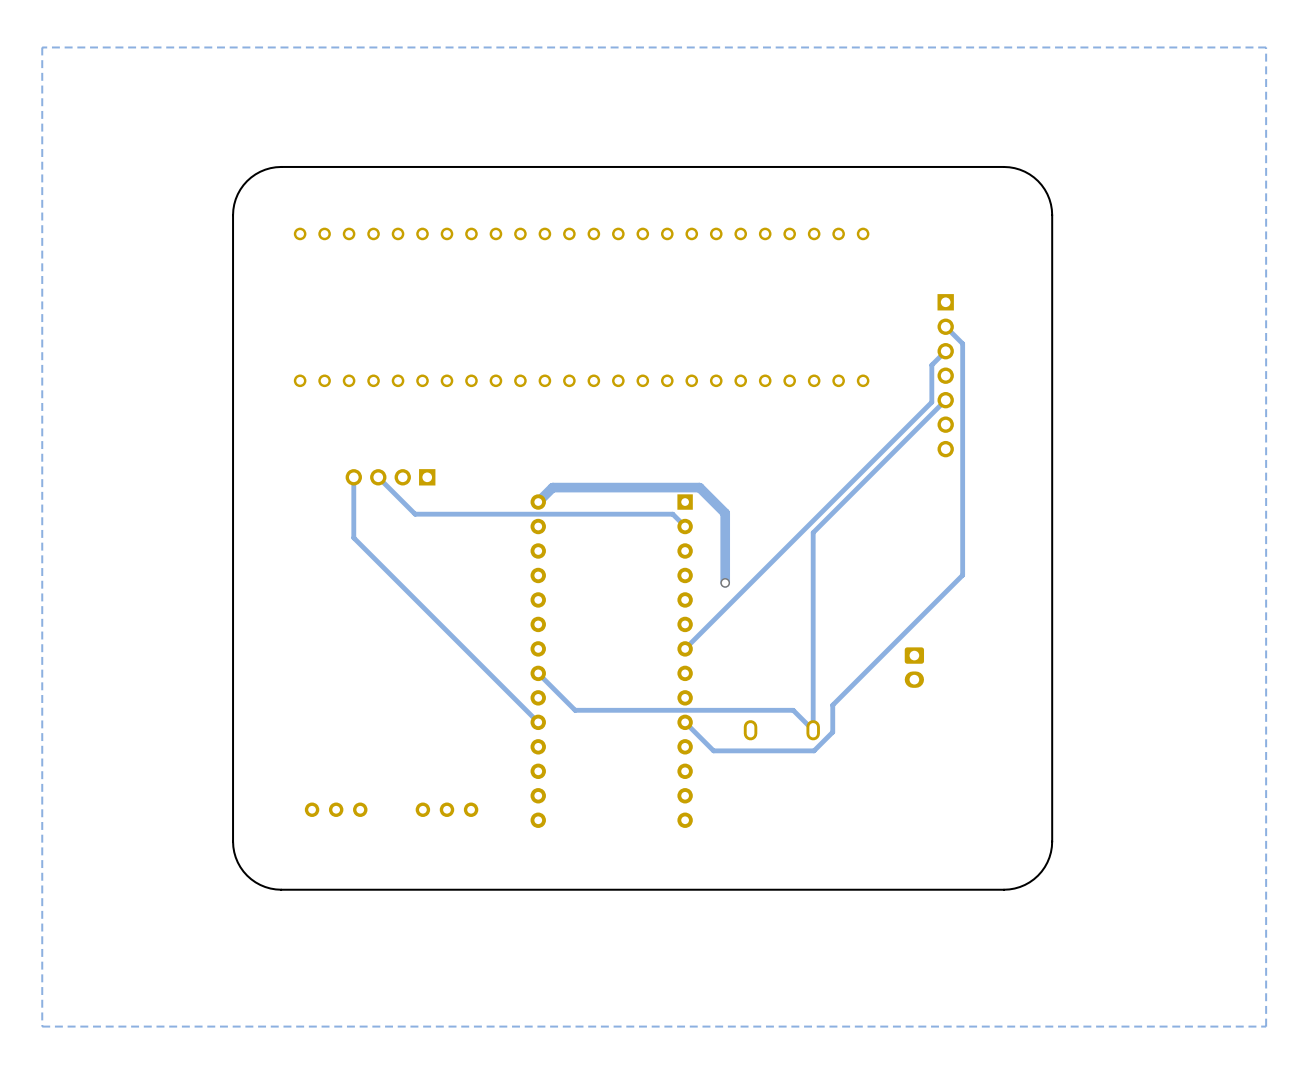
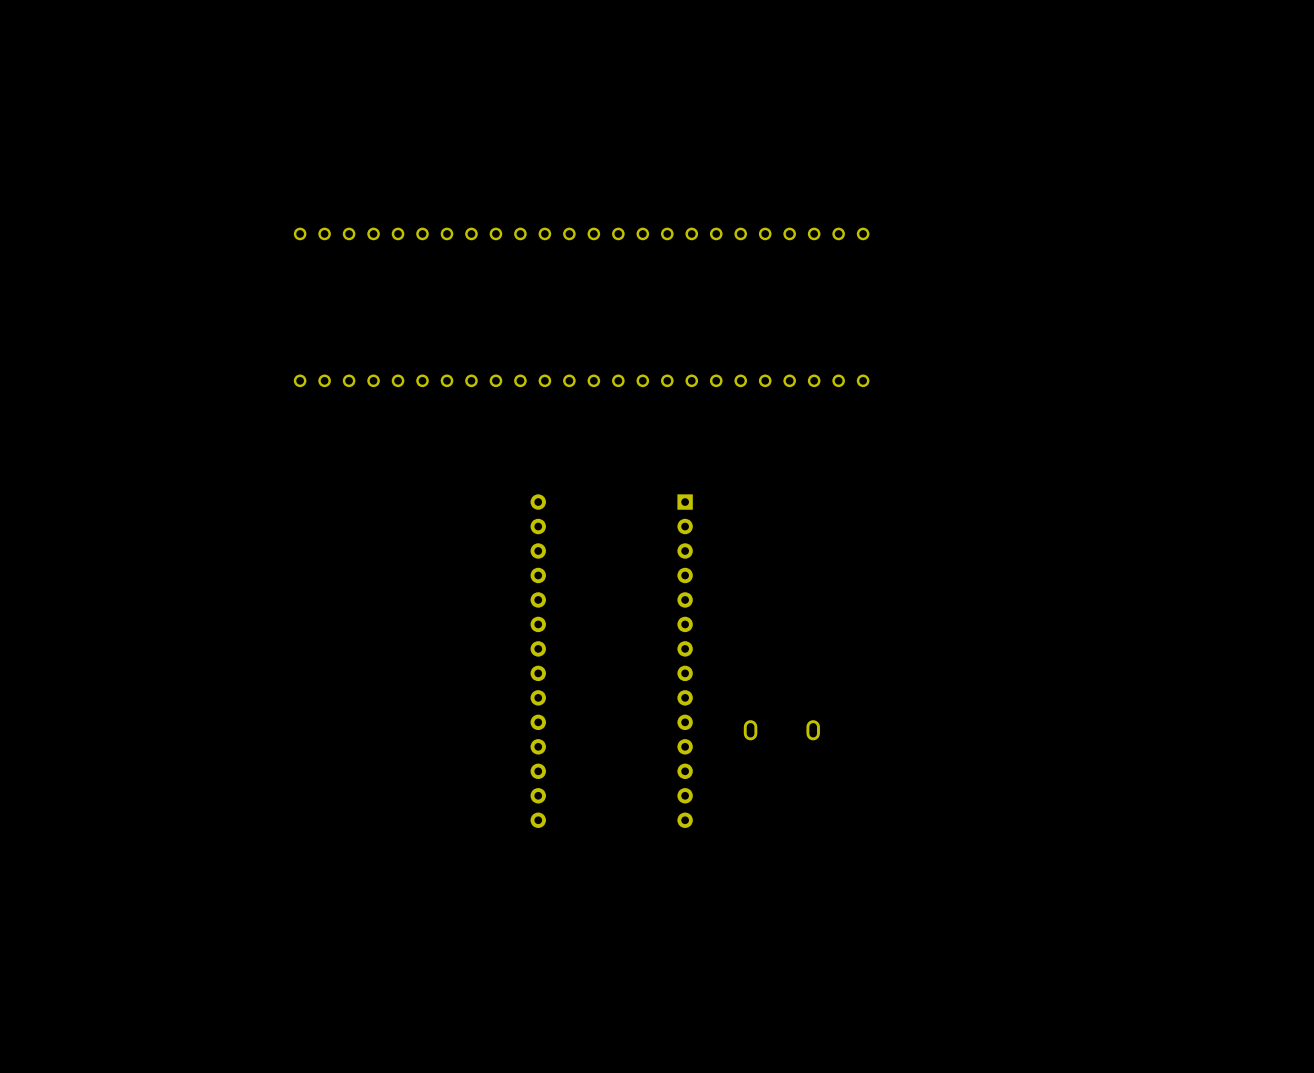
zone outline: (1266, 47) (42, 47) (42, 1026) (1266, 1026) (1266, 47) -> none
board edge: (1004, 166) (281, 166) (260, 171) (247, 181) (237, 194) (233, 215) (233, 841) (237, 862) (247, 875) (260, 884) (281, 889) (1004, 889) (1019, 887) (1038, 875) (1049, 857) (1052, 841) (1052, 215) (1047, 194) (1038, 181) (1024, 171) (1004, 166) -> none
track: (945, 326) (962, 343) (962, 575) (832, 705) (832, 732) (814, 750) (713, 750) (685, 722) -> none
track: (945, 351) (931, 365) (931, 402) (685, 648) -> none
part: (945, 375) -> none
track: (945, 400) (813, 532) (813, 730) (793, 710) (575, 710) (538, 673) -> none
track: (353, 477) (353, 537) (538, 722) -> none
track: (378, 477) (415, 514) (672, 514) (685, 526) -> none
part: (390, 477) -> none
track: (538, 502) (552, 487) (699, 487) (725, 513) (725, 582) -> none
via: (725, 582) -> none
part: (914, 667) -> none
part: (336, 809) -> none
part: (446, 809) -> none

